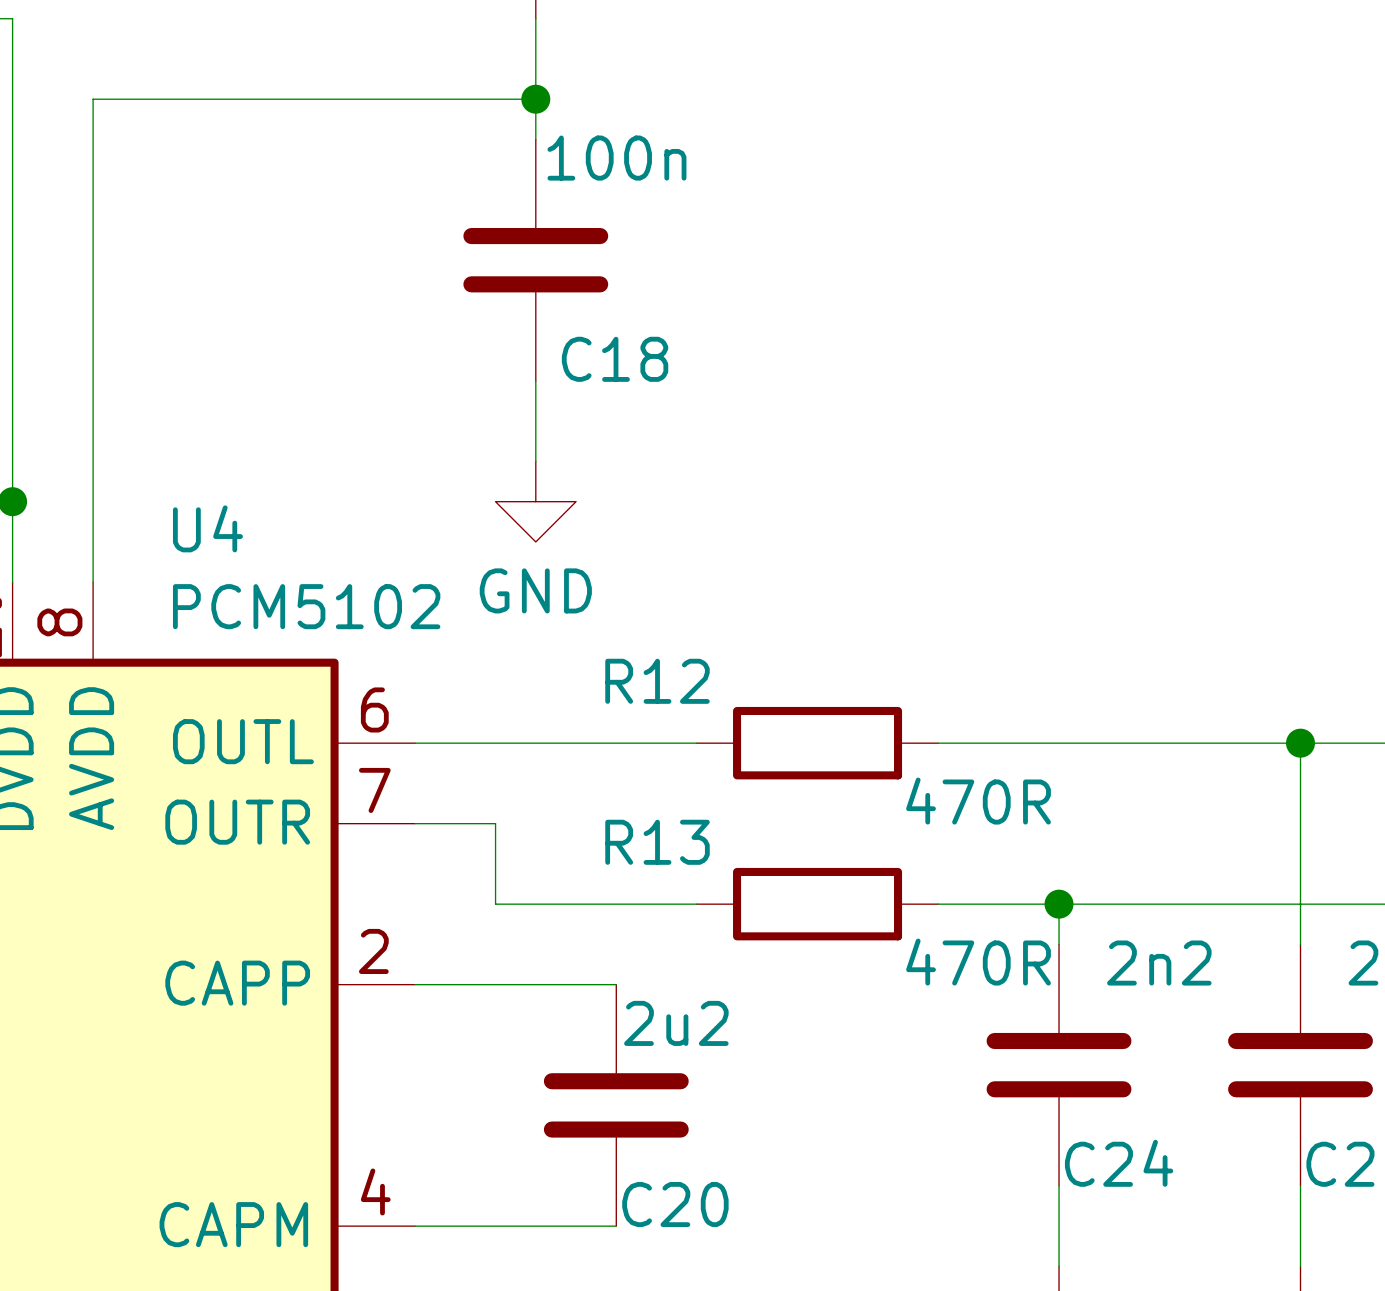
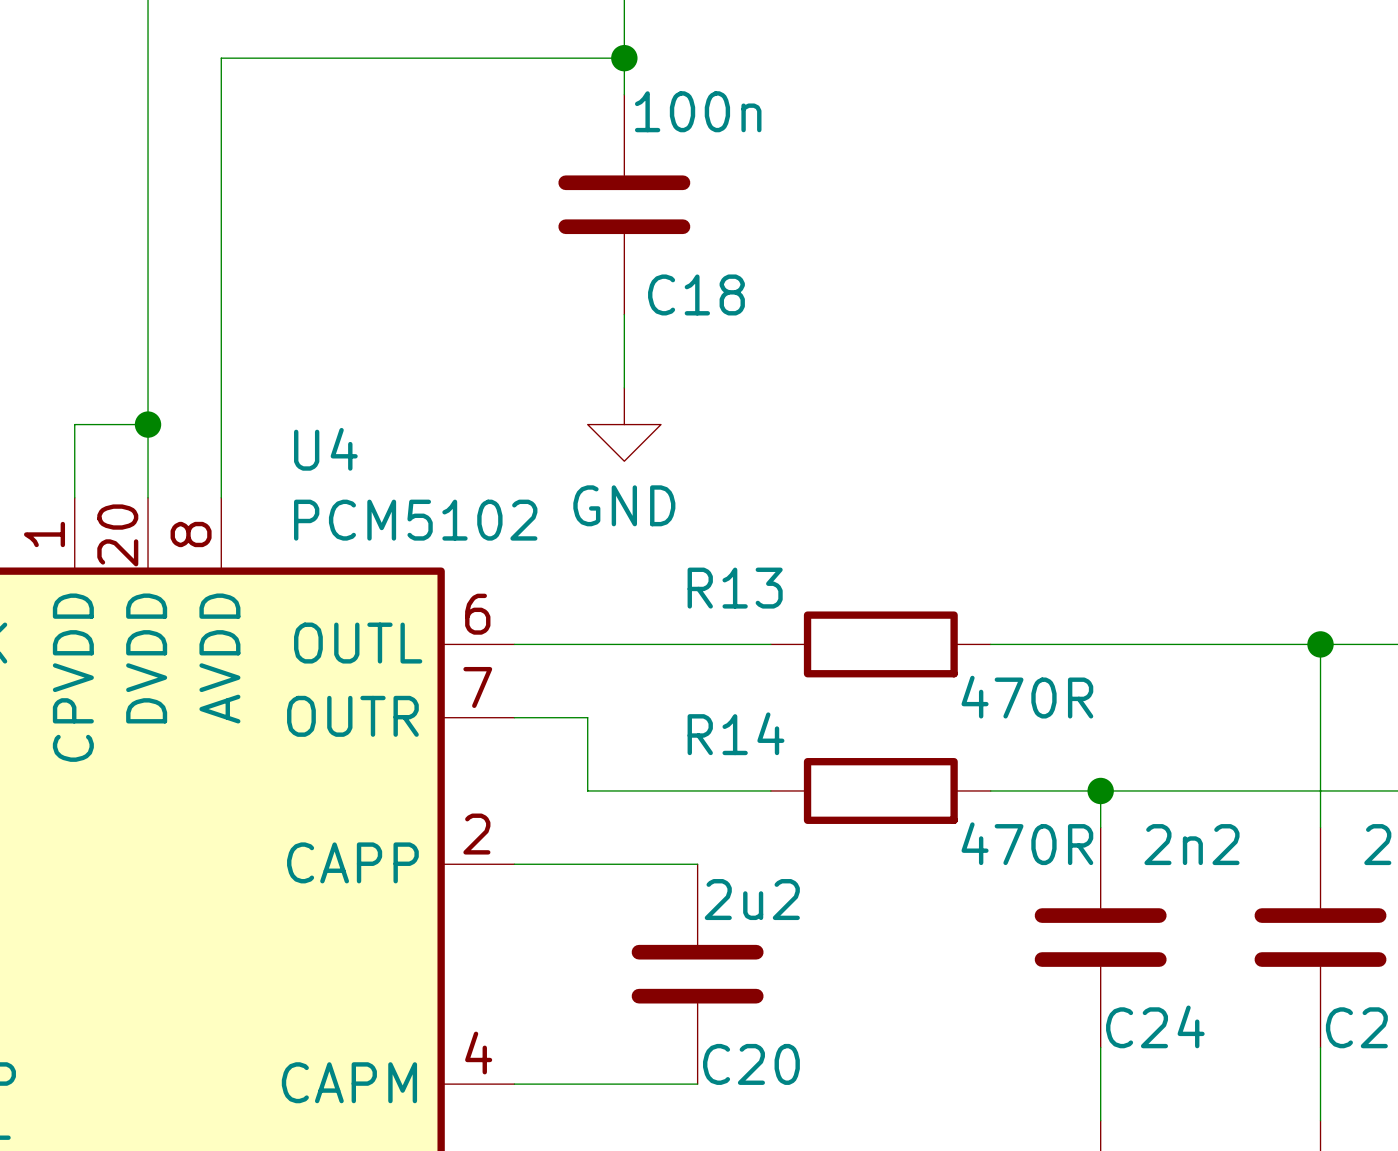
R12 name: R12 (657, 681) -> R13 (735, 588)
R13 name: R13 (657, 842) -> R14 (736, 733)

